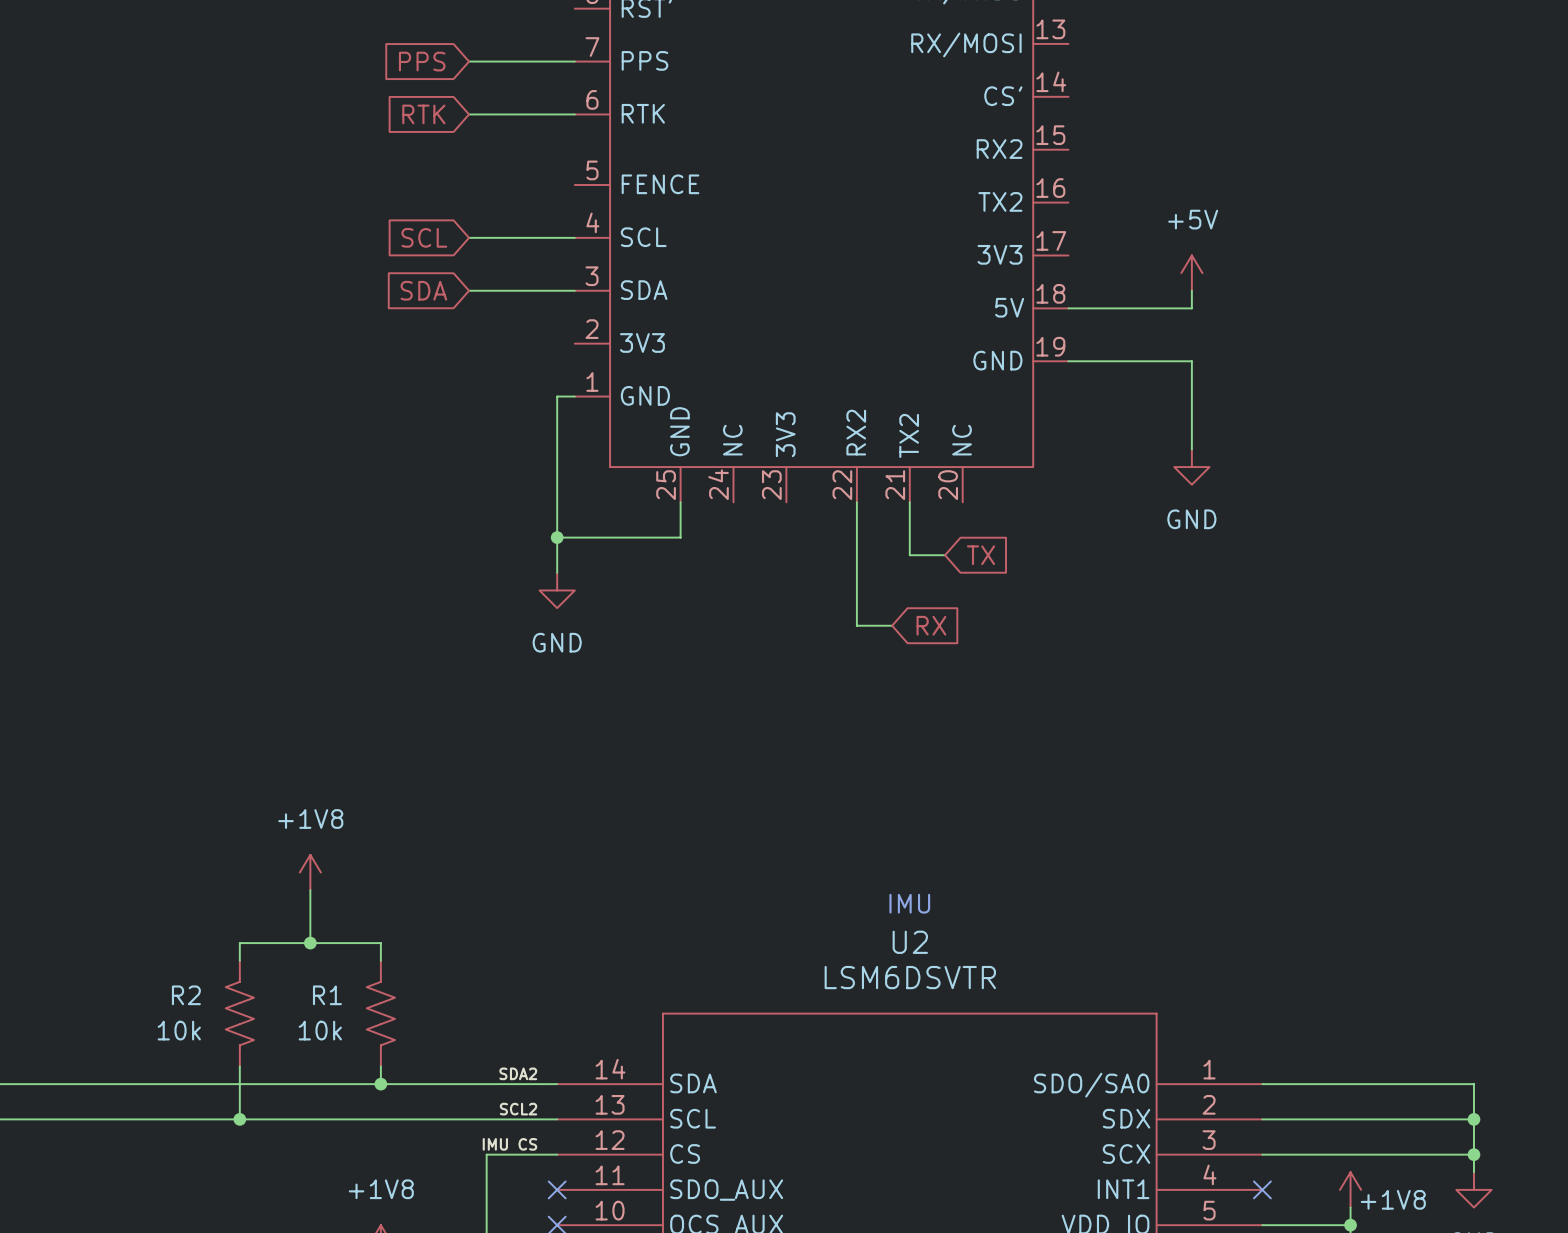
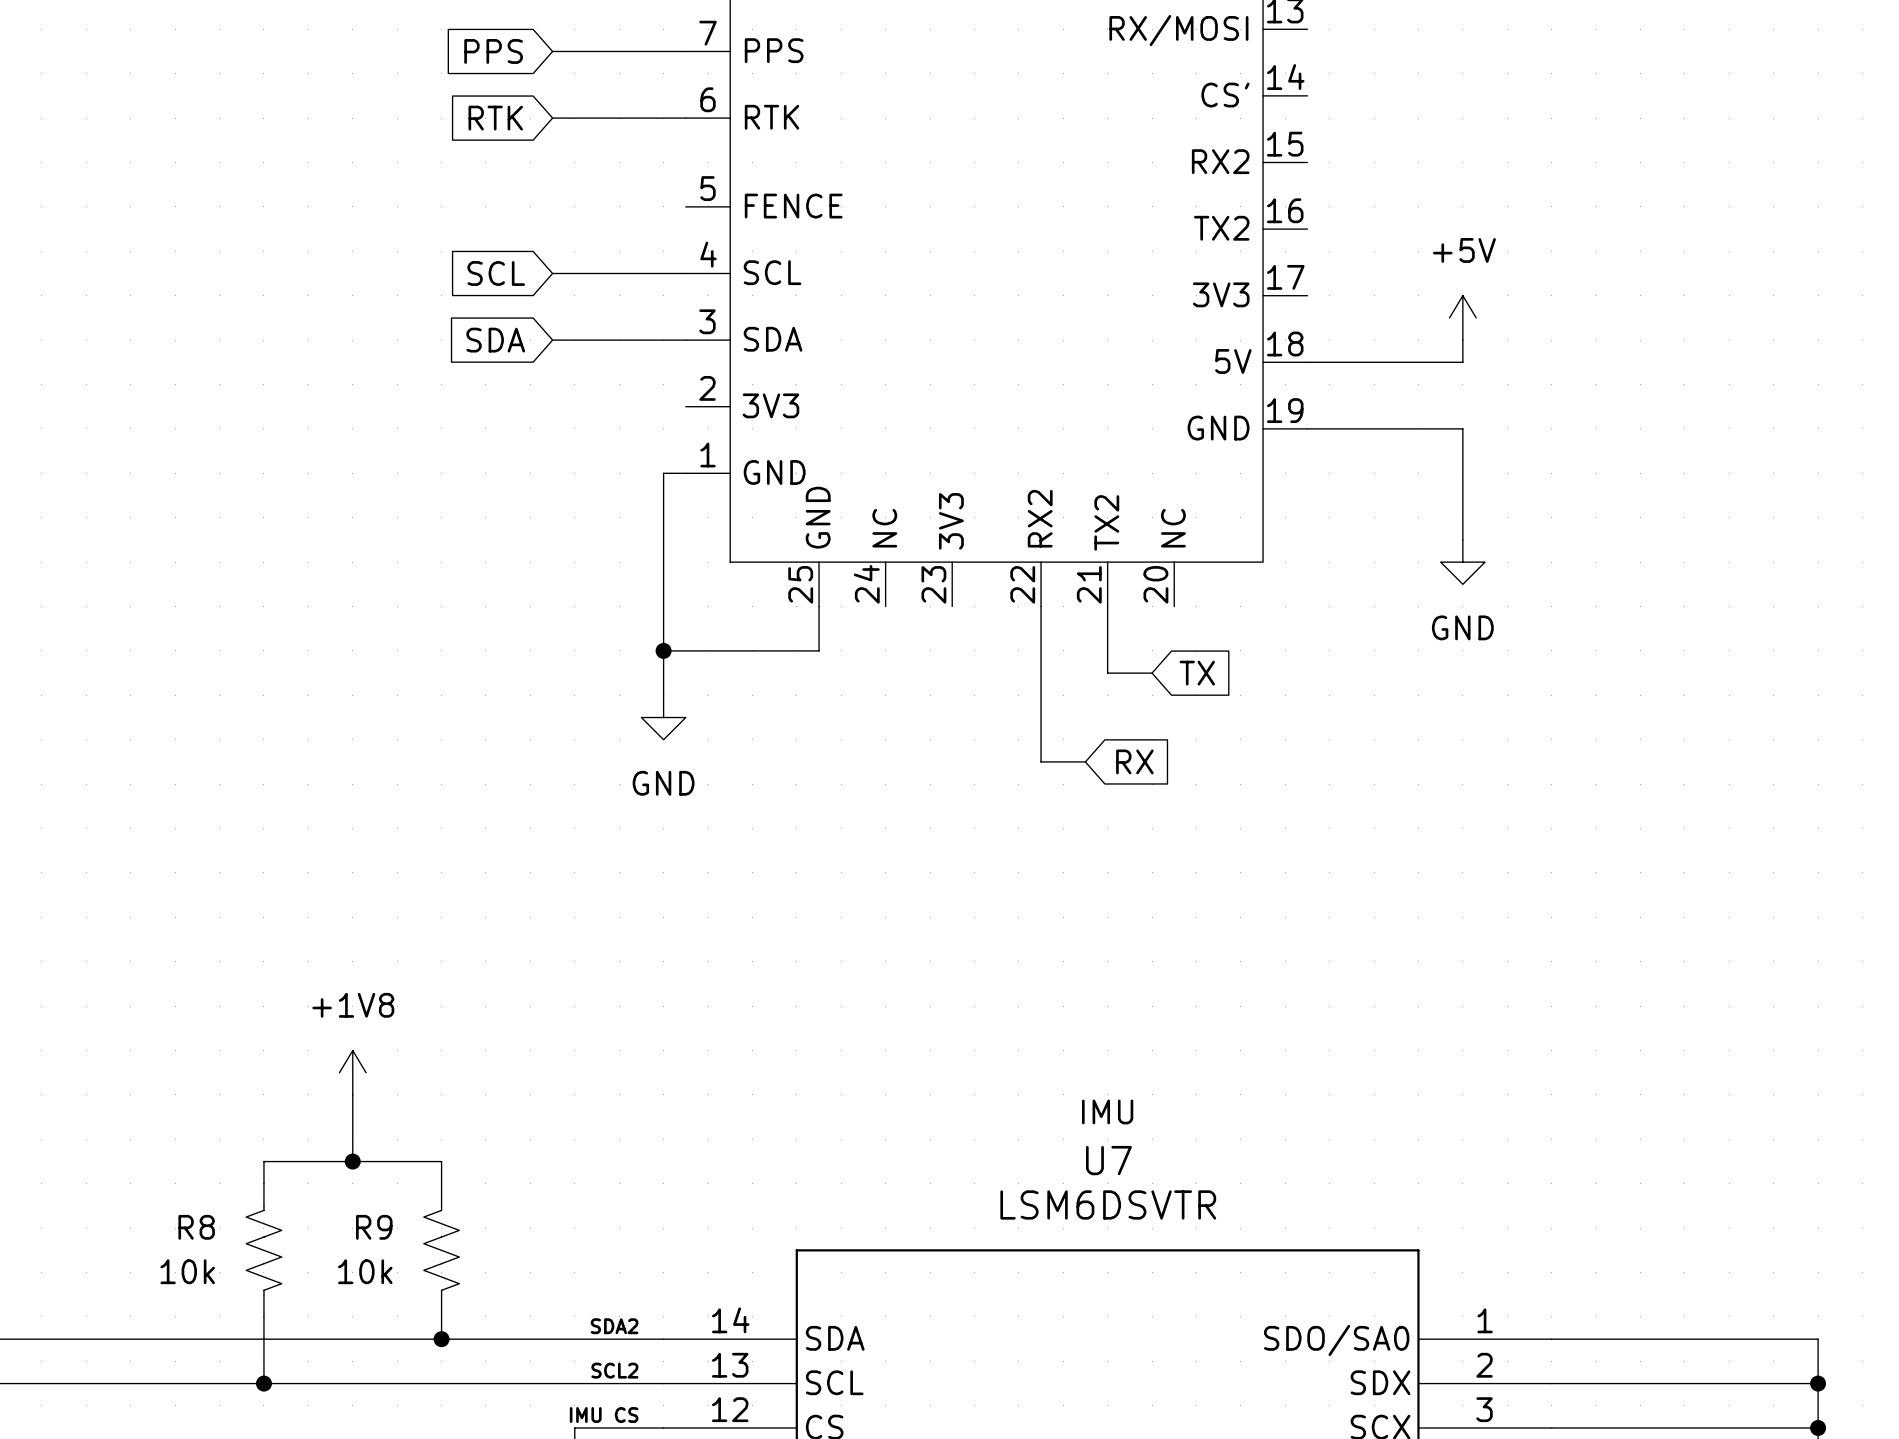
U2 name: U2 (910, 942) -> U7 (1108, 1160)
R2 name: R2 (186, 995) -> R8 (196, 1227)
R1 name: R1 (327, 995) -> R9 (374, 1227)

